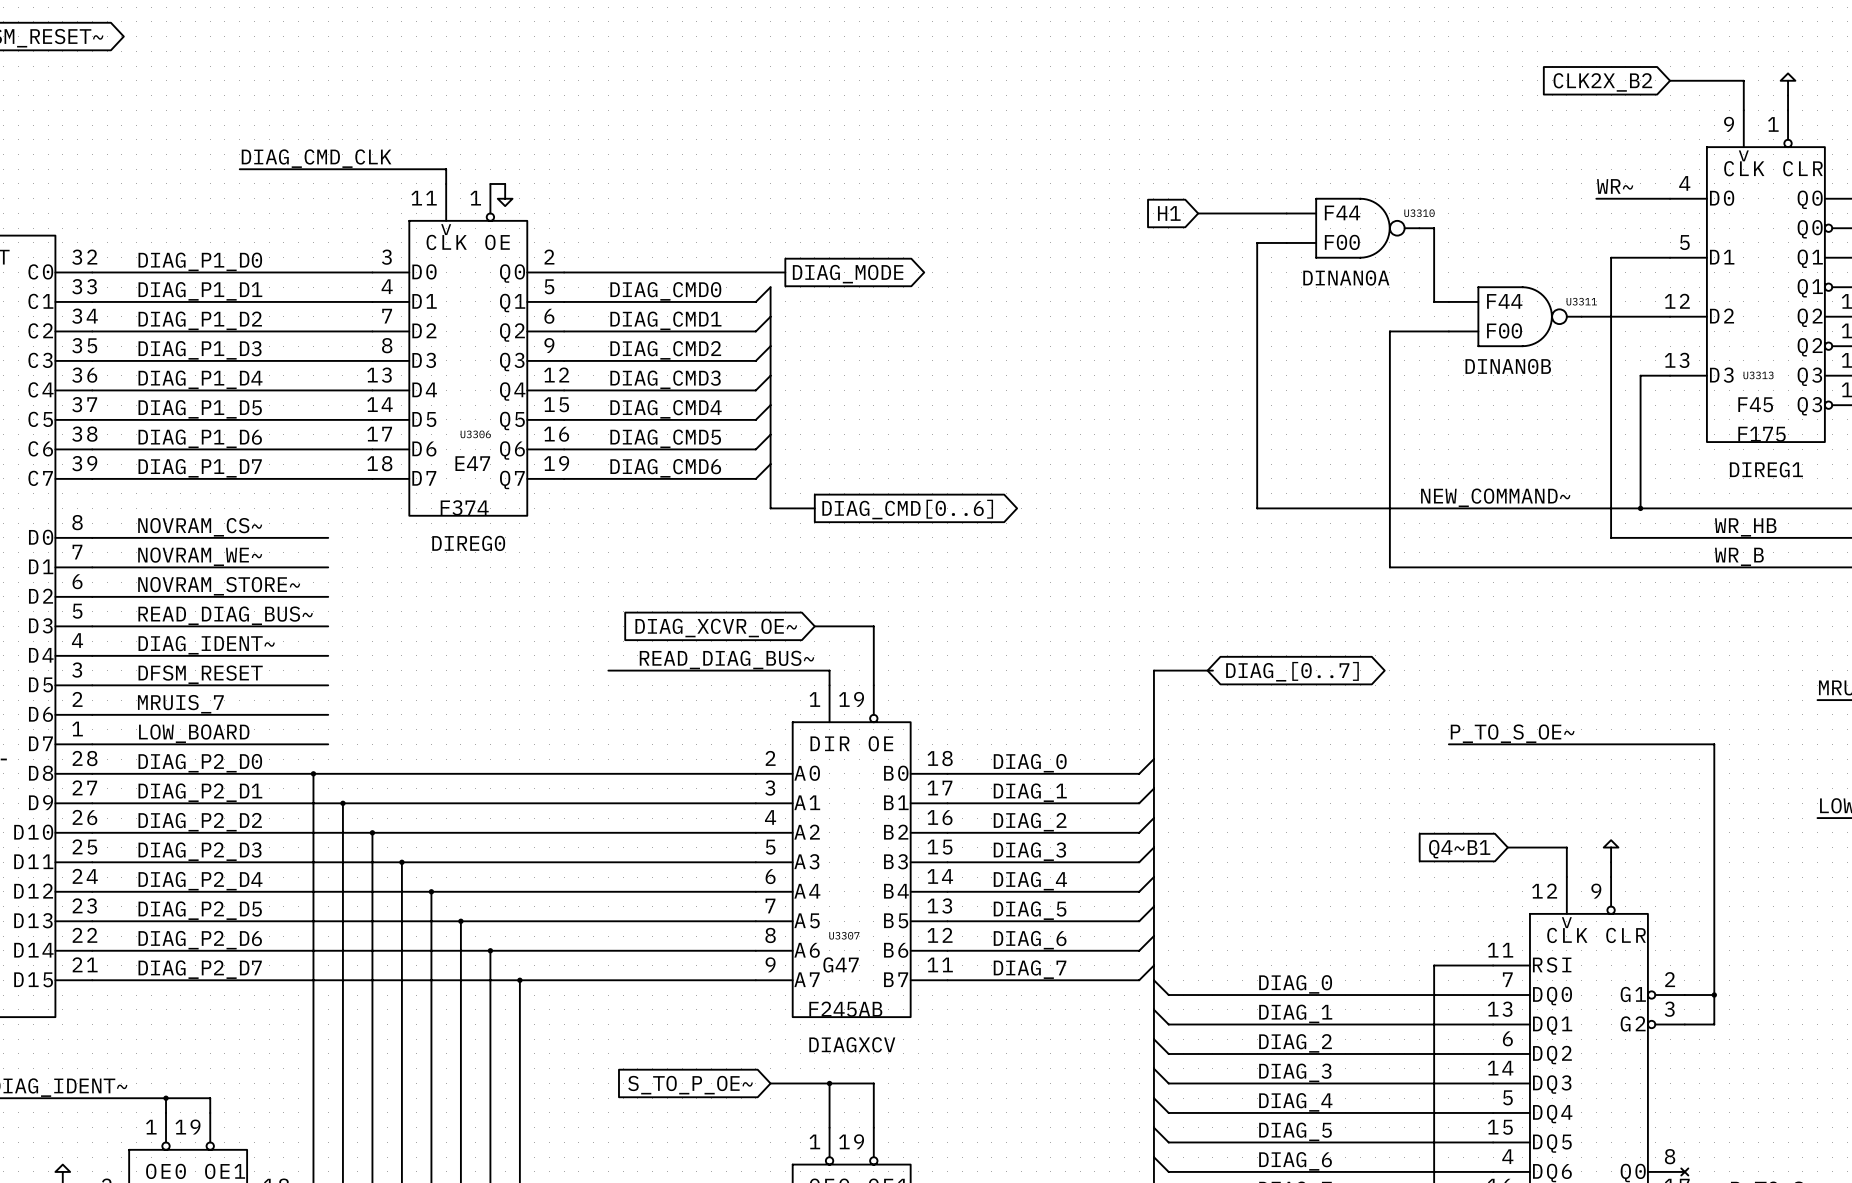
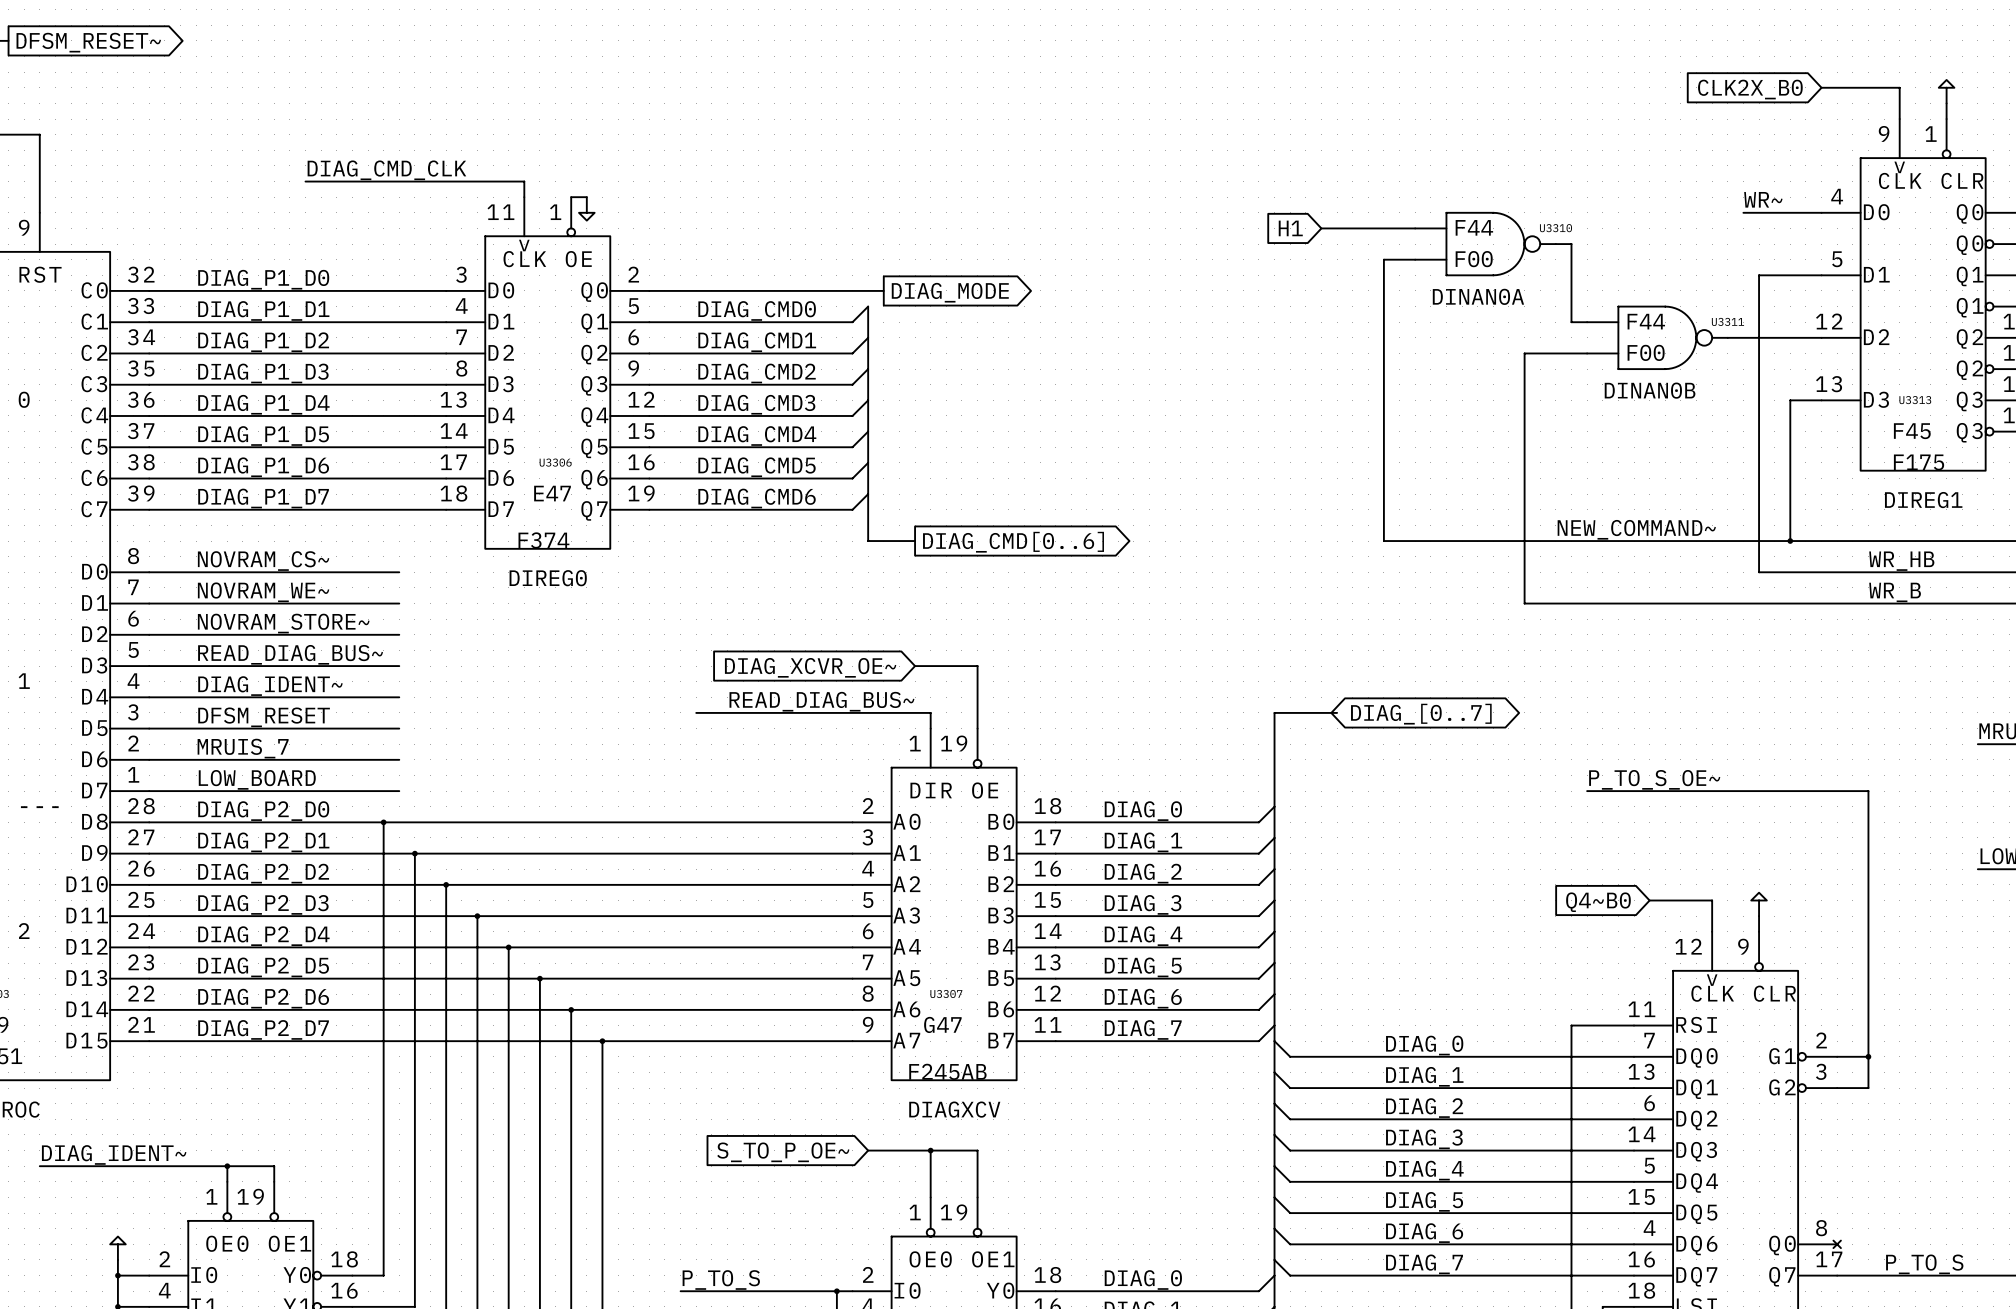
global label: CLK2X_B2 (1602, 82) -> CLK2X_B0 (1750, 89)
global label: Q4~B1 (1459, 849) -> Q4~B0 (1598, 902)

